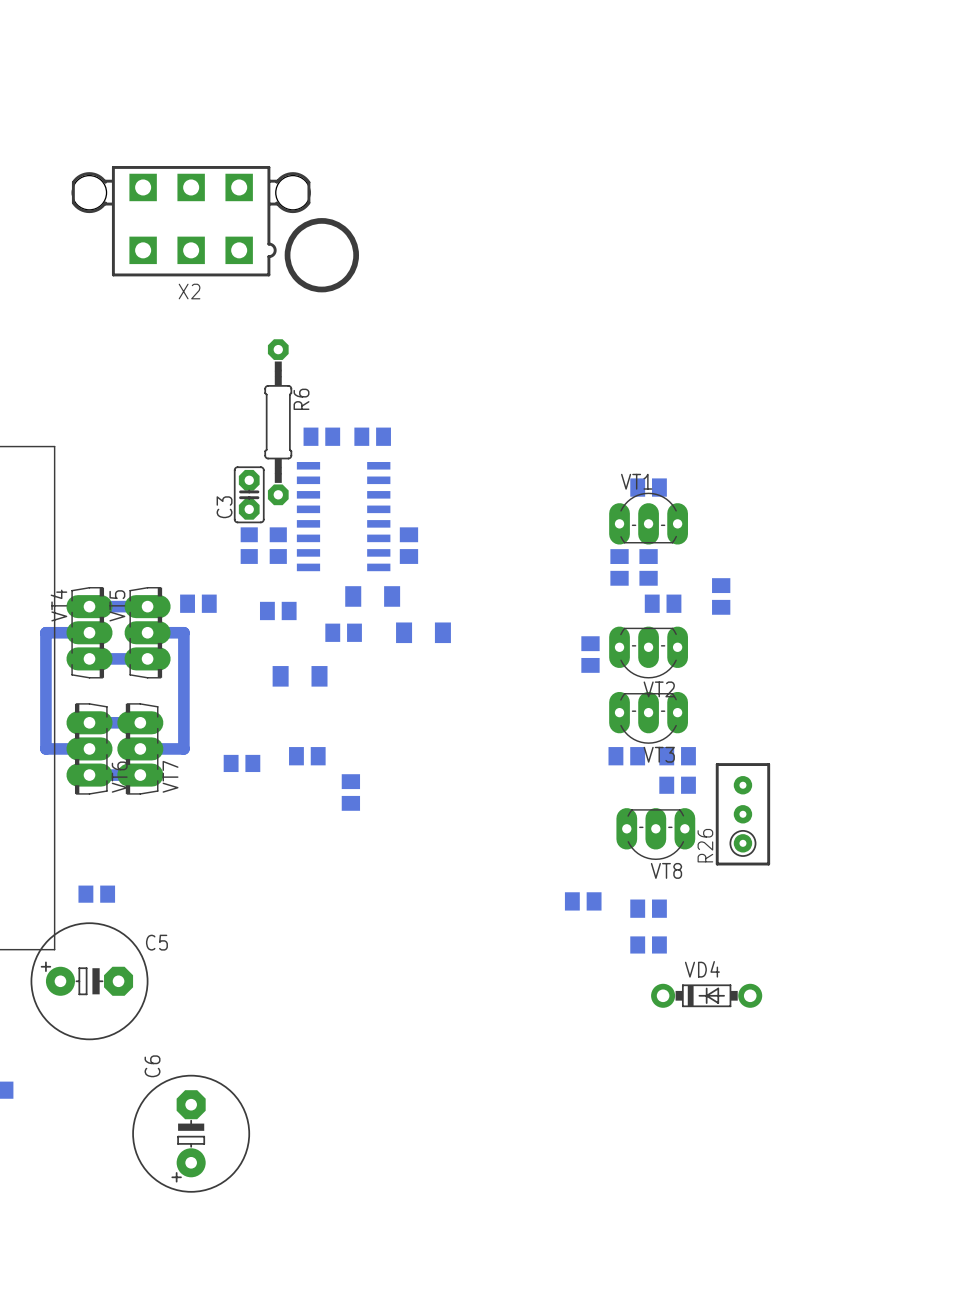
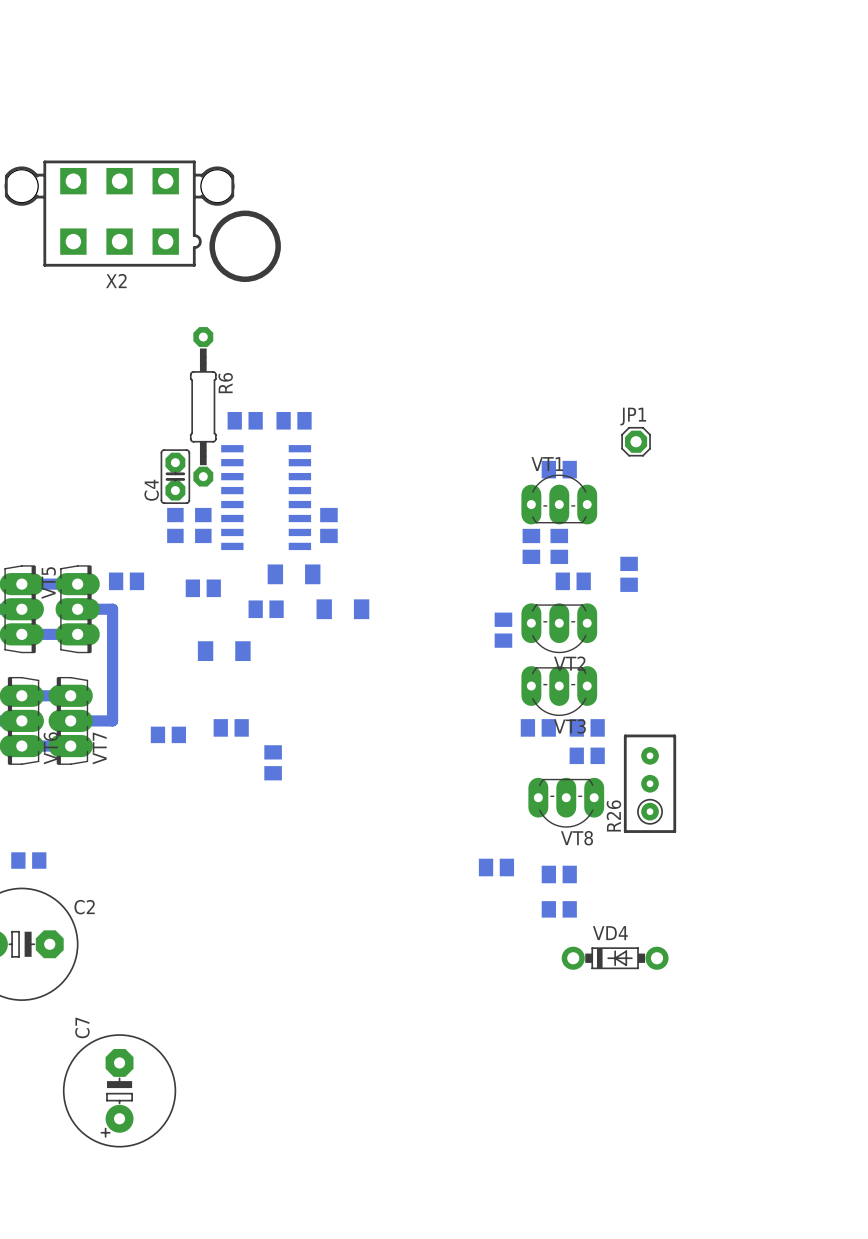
JP1: none -> (636, 441)
C3 name: C3 (224, 507) -> C4 (151, 490)
C5 name: C5 (156, 942) -> C2 (84, 907)
C6 name: C6 (152, 1066) -> C7 (82, 1027)

